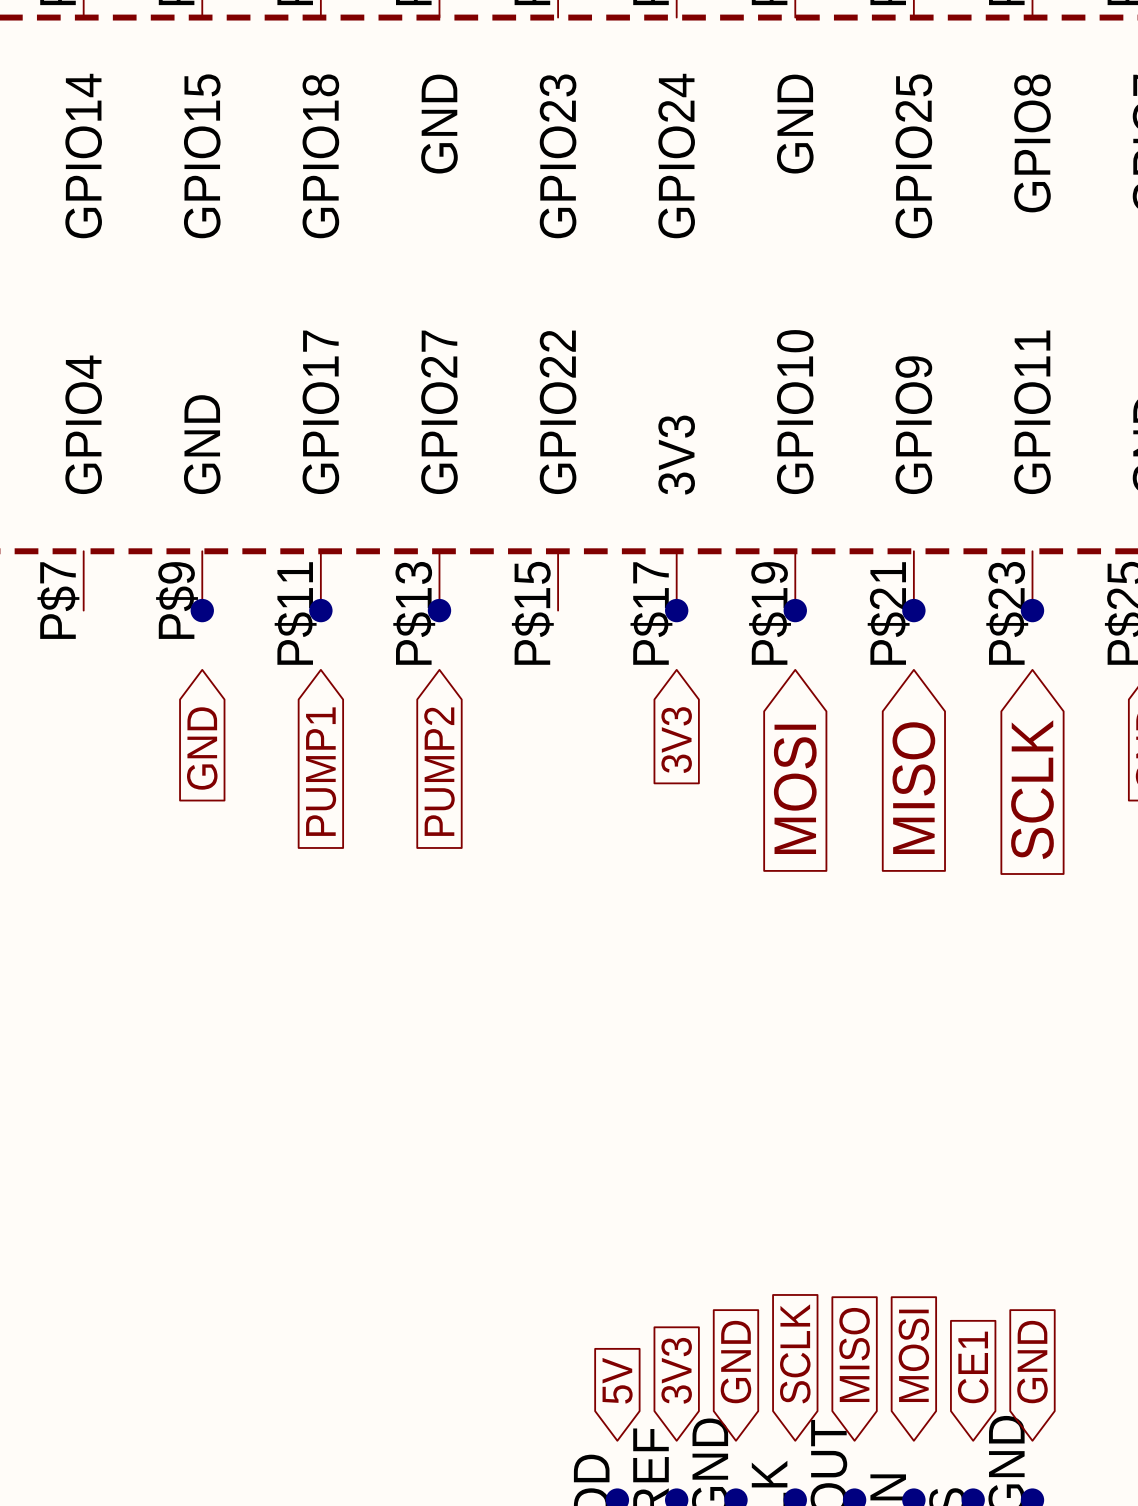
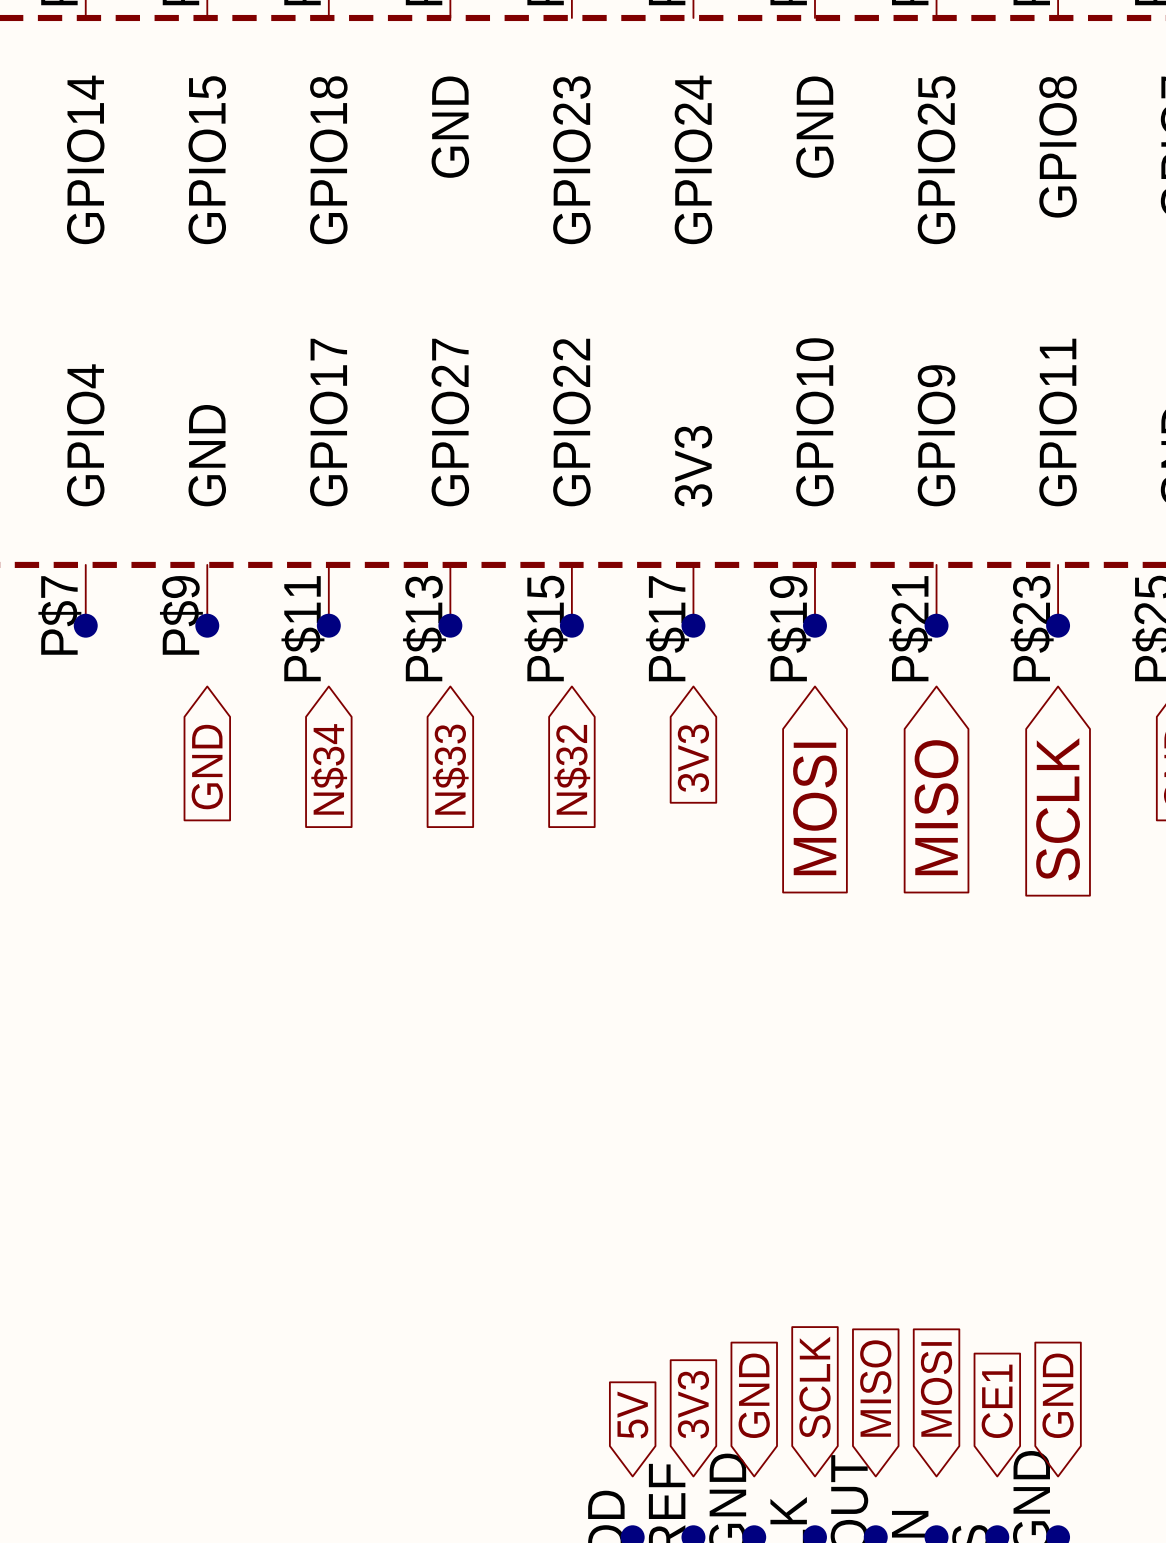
junction: none -> (85, 625)
junction: none -> (571, 625)
global label: none -> N$32 (572, 769)
global label: PUMP1 (321, 771) -> N$34 (329, 769)
global label: PUMP2 (439, 771) -> N$33 (450, 769)

